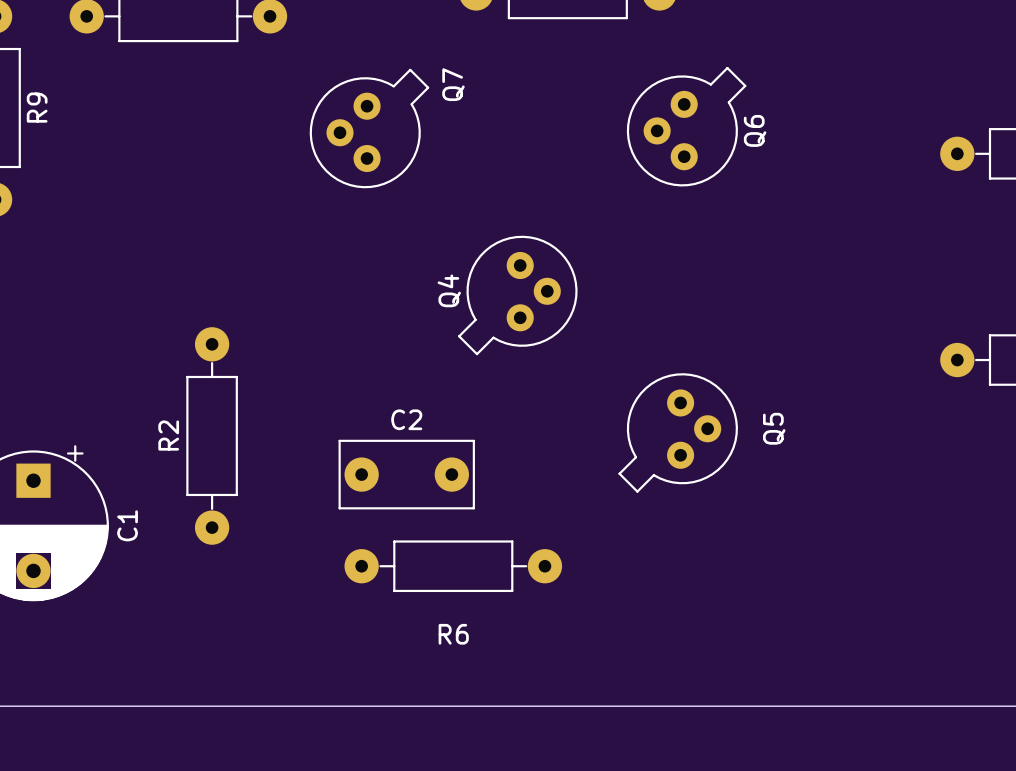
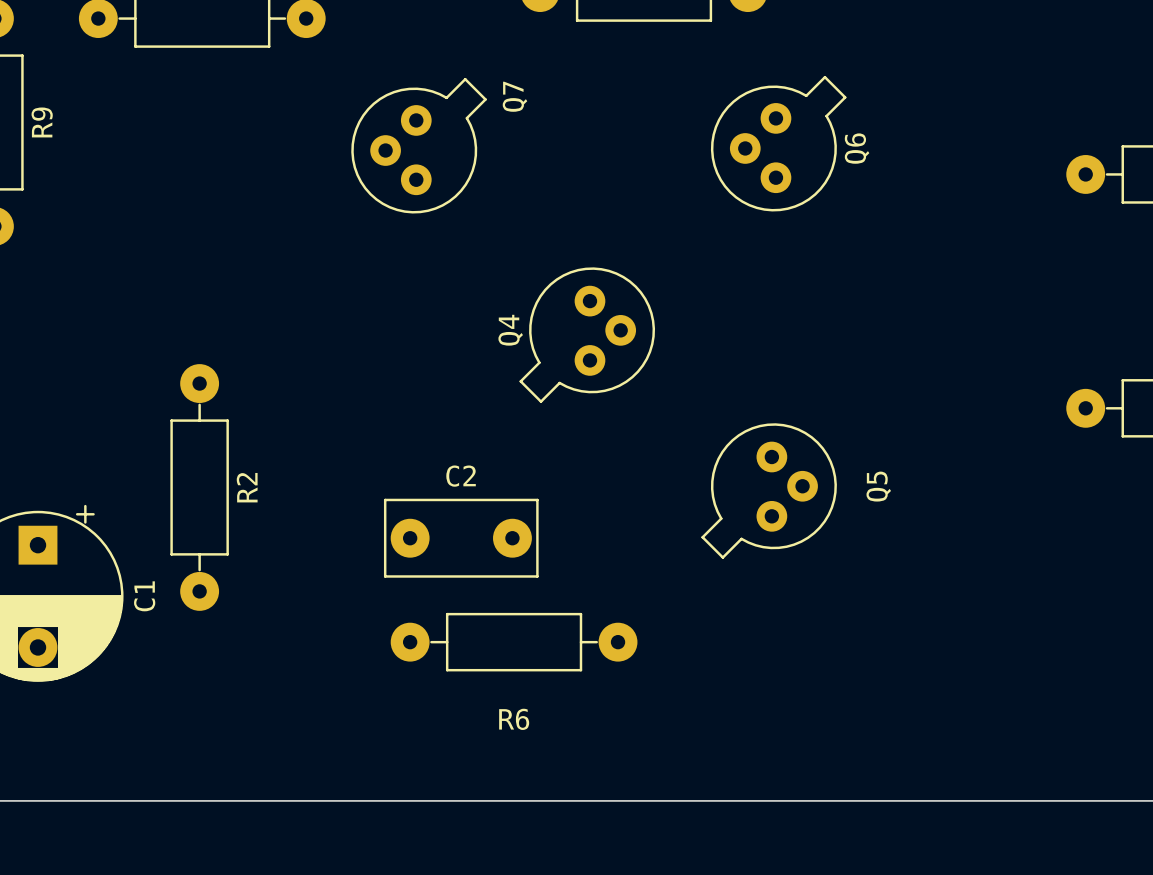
R2 name position: R2 (168, 435) -> R2 (247, 487)
R2 position: (212, 435) -> (199, 487)

